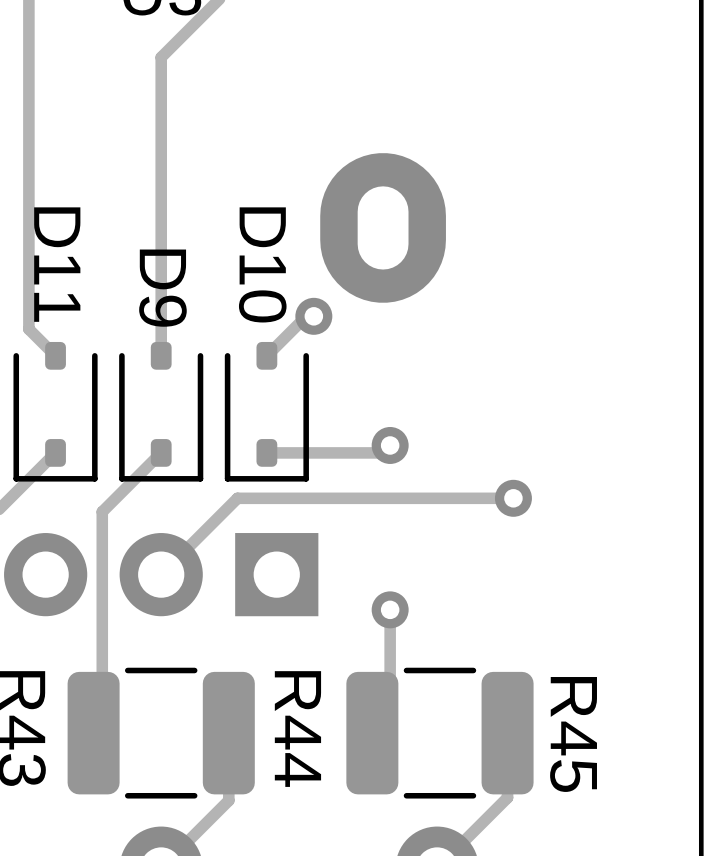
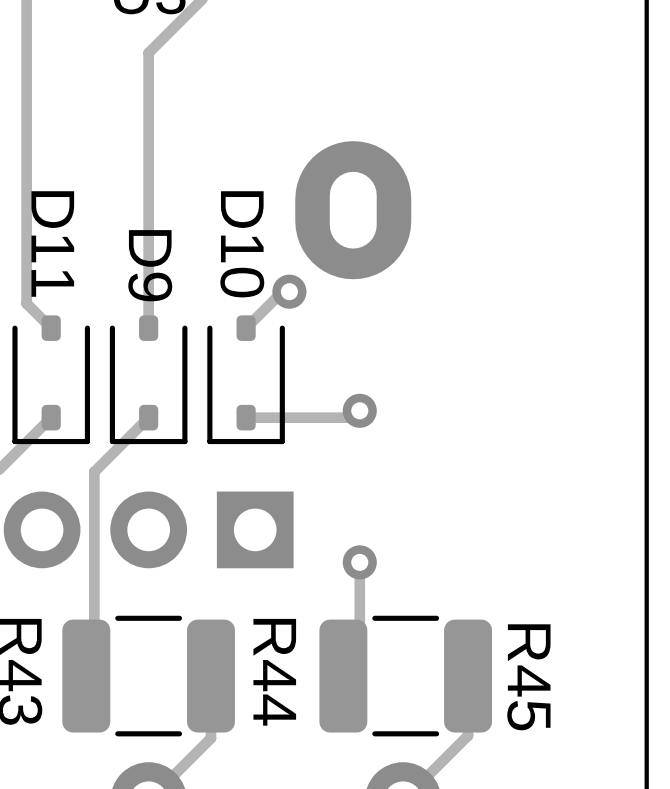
track: (513, 498) (237, 498) (161, 574) -> none
via: (513, 498) -> none

